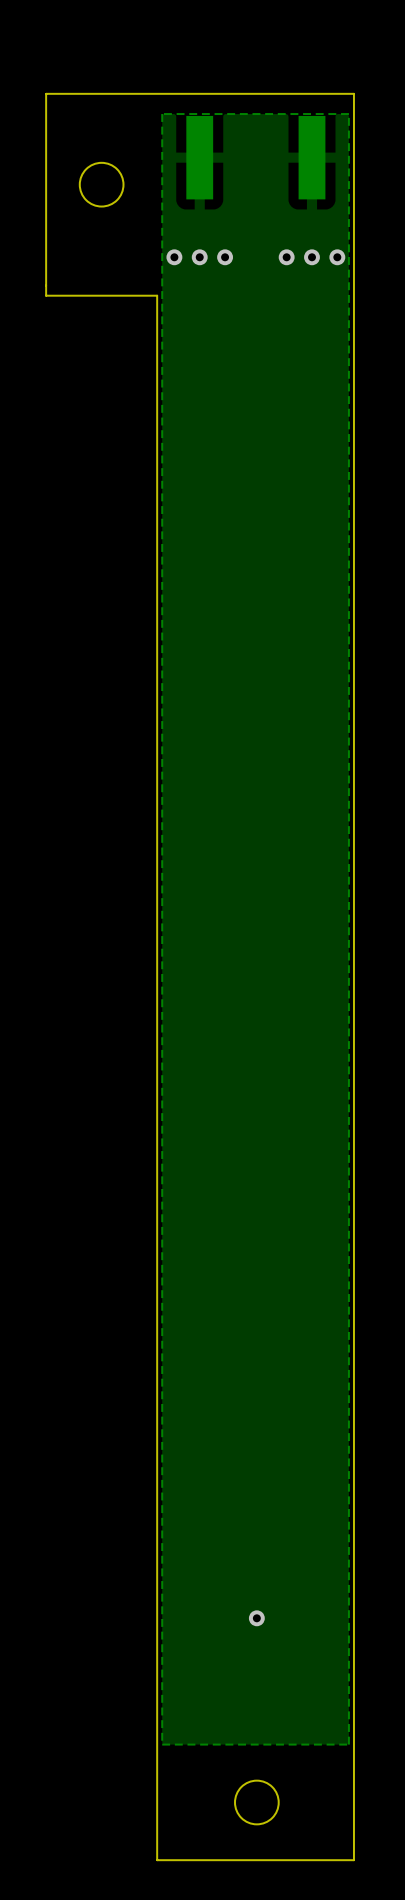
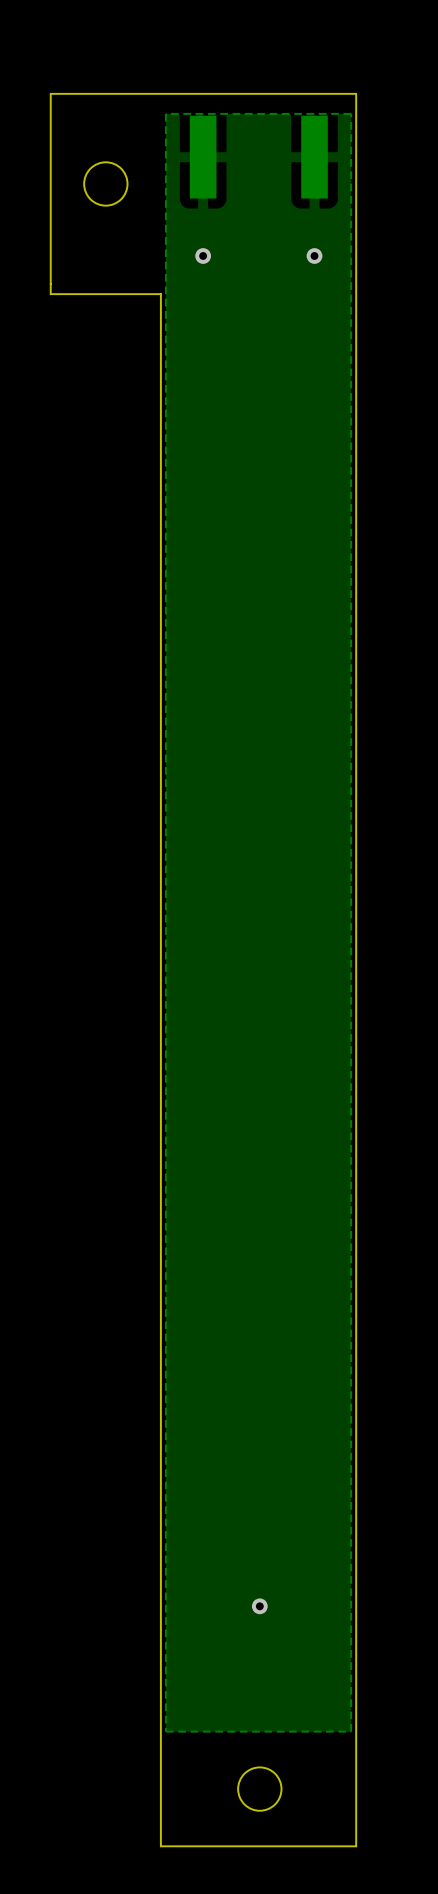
via: (174, 257) -> none
via: (225, 257) -> none
via: (286, 257) -> none
via: (337, 257) -> none

